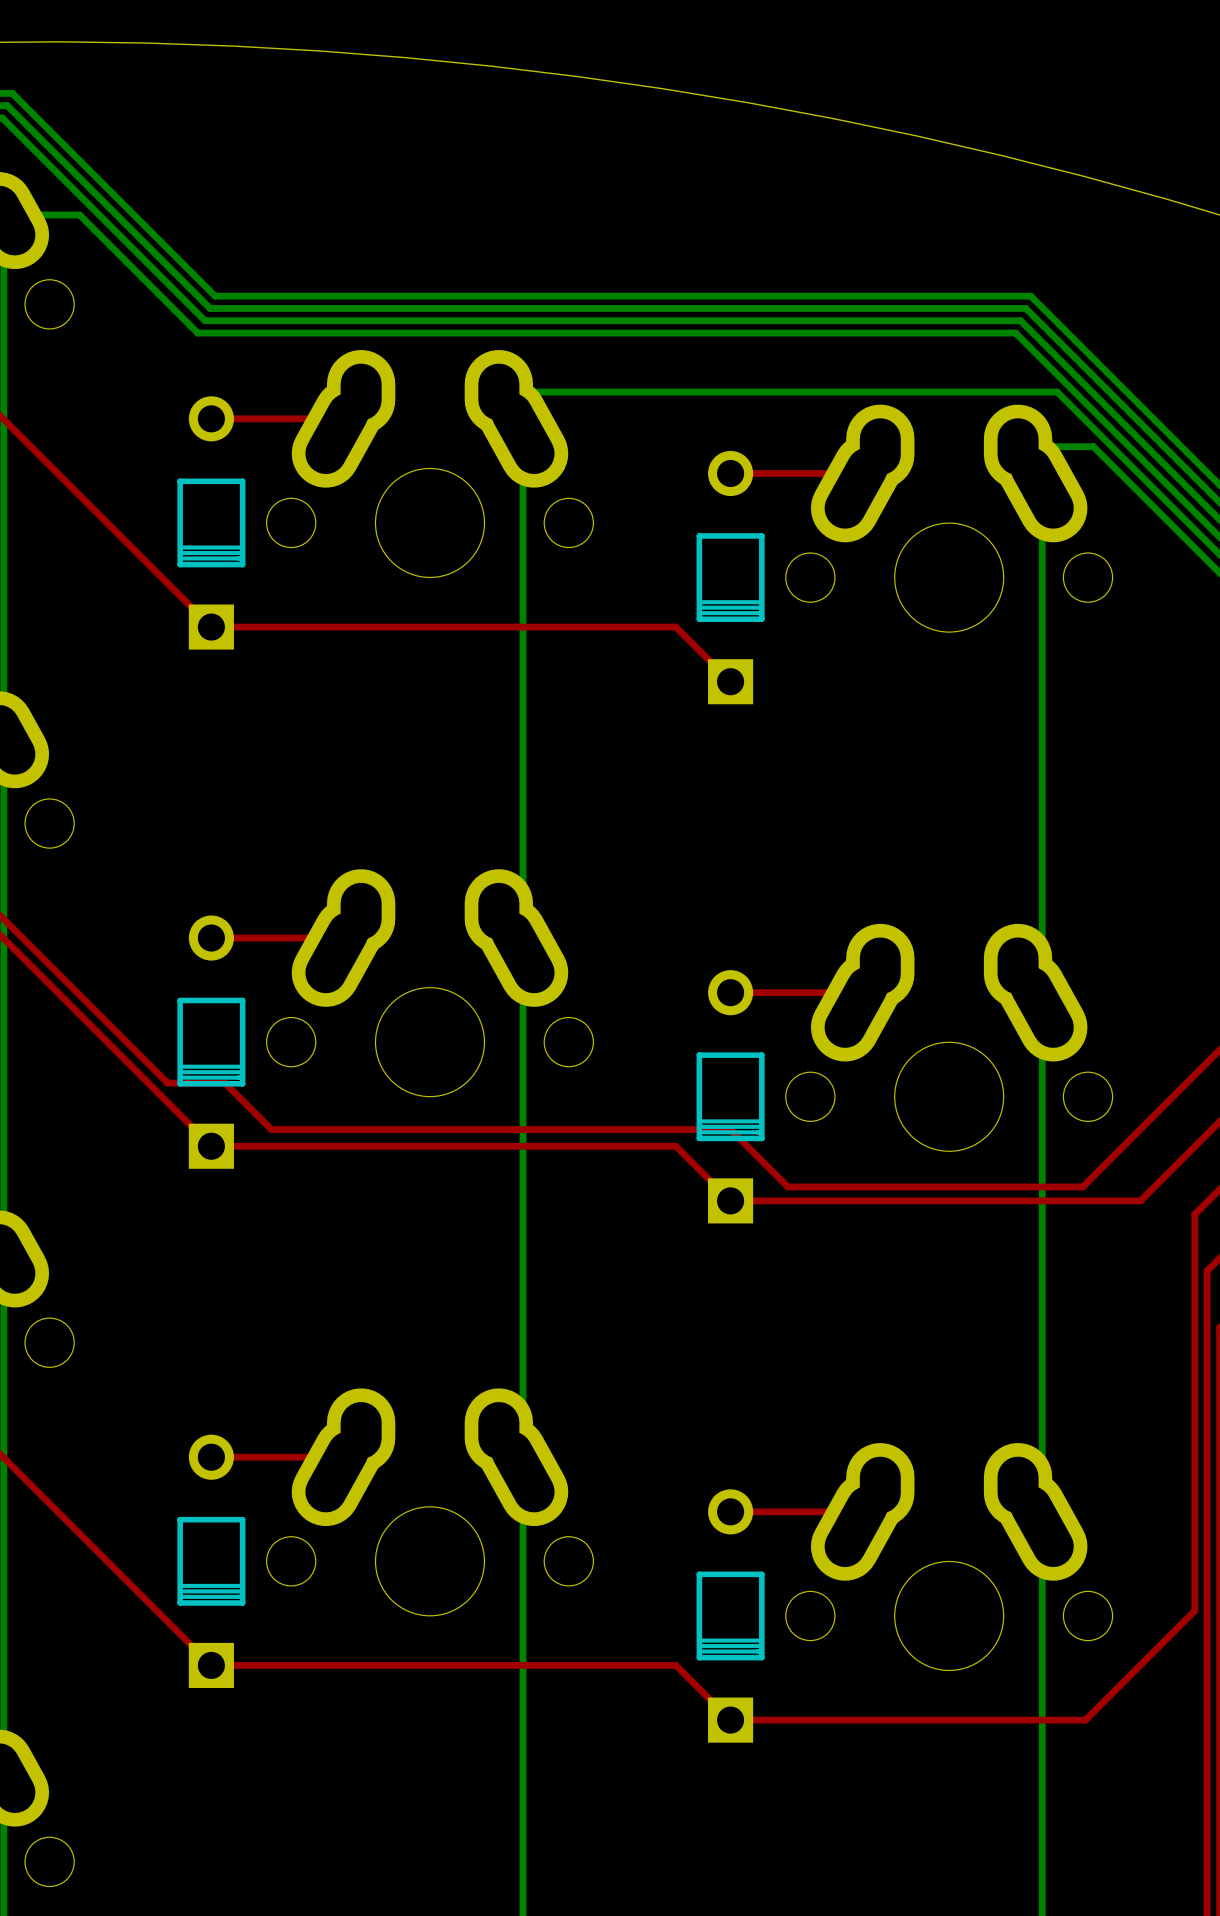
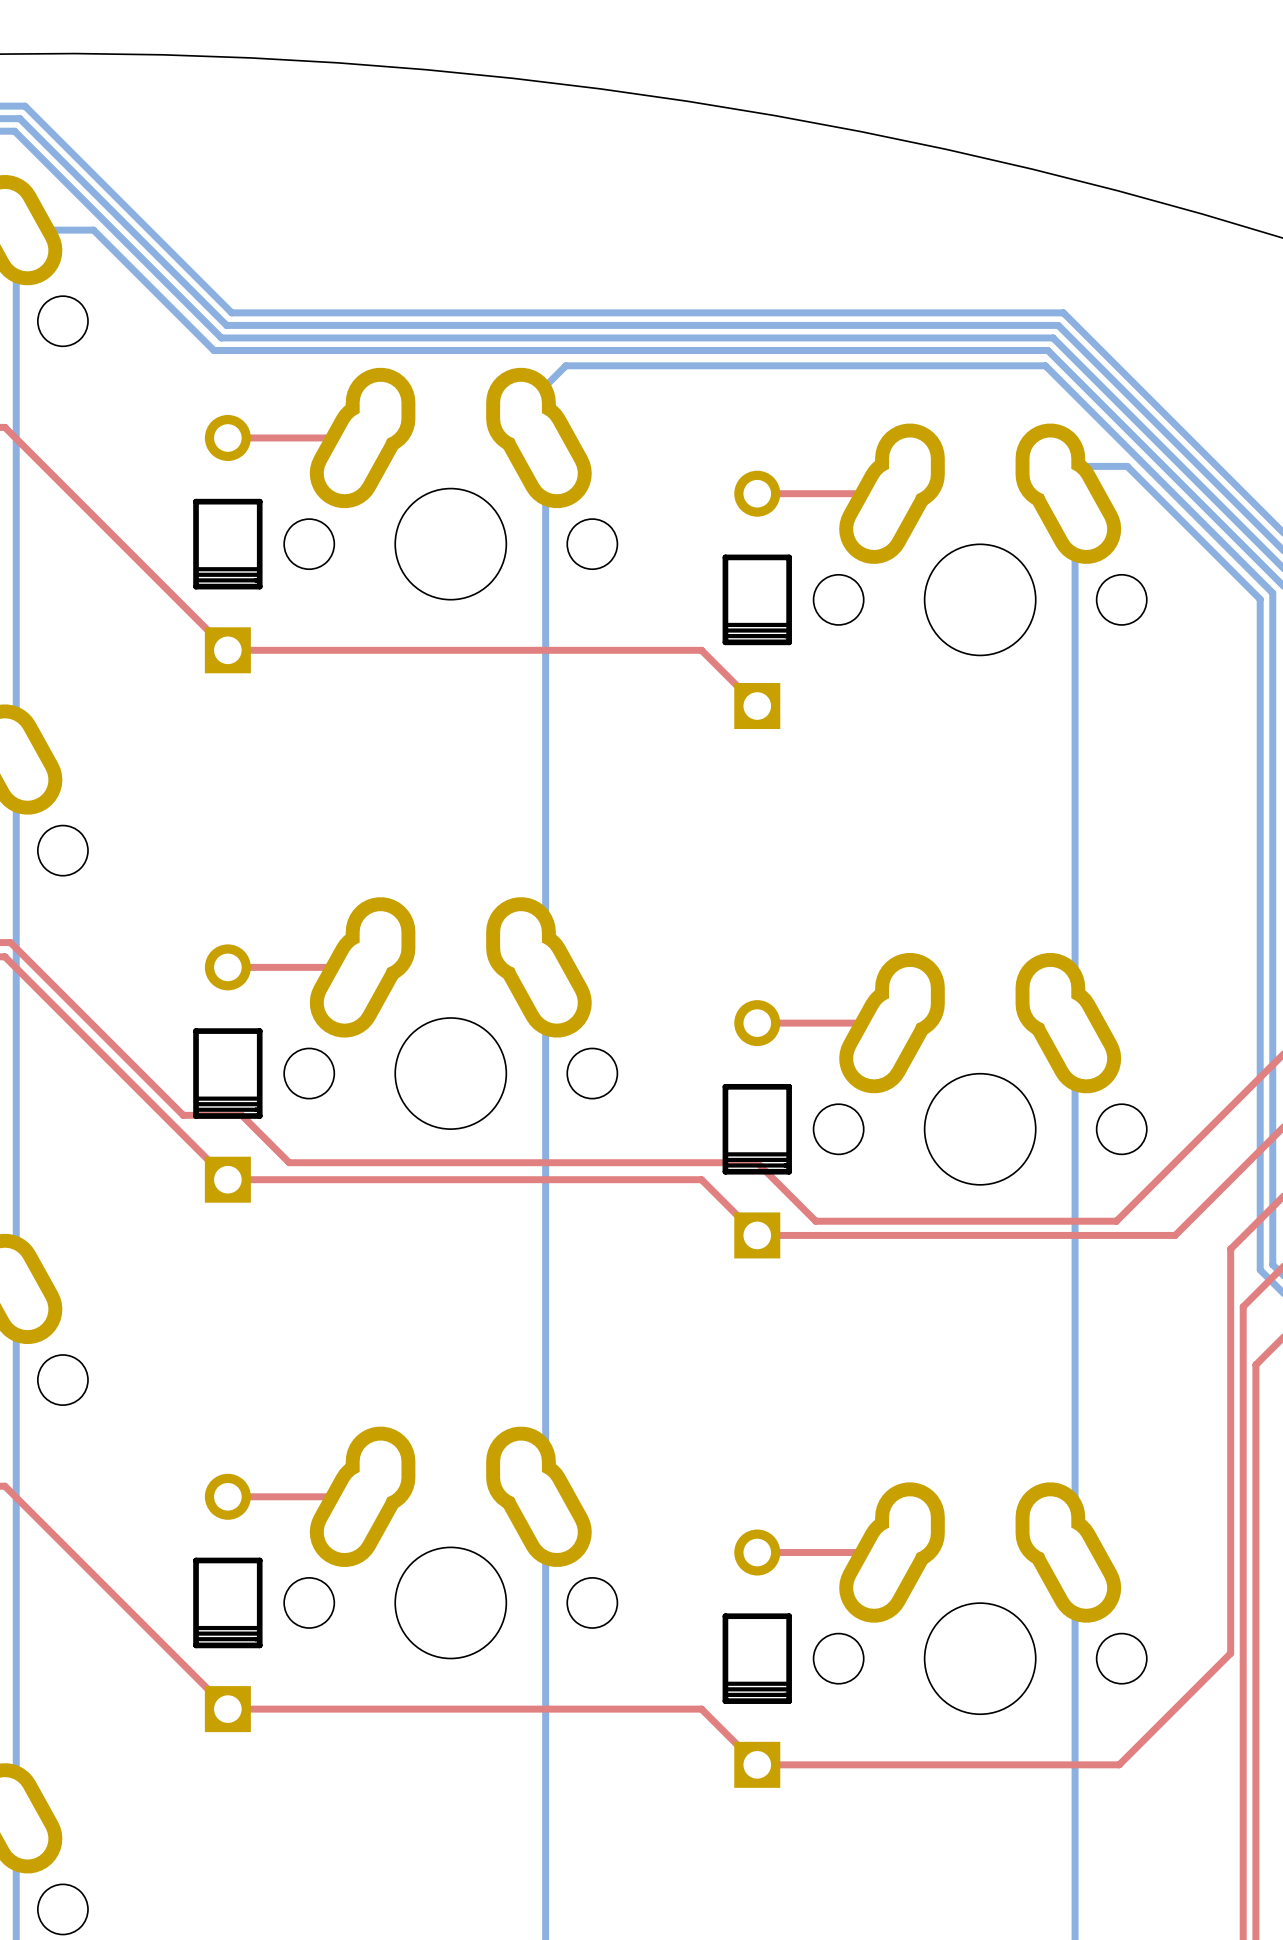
bottom track: (498, 392) (1057, 392) -> (520, 410) (565, 365) (1045, 365) (1090, 410)

